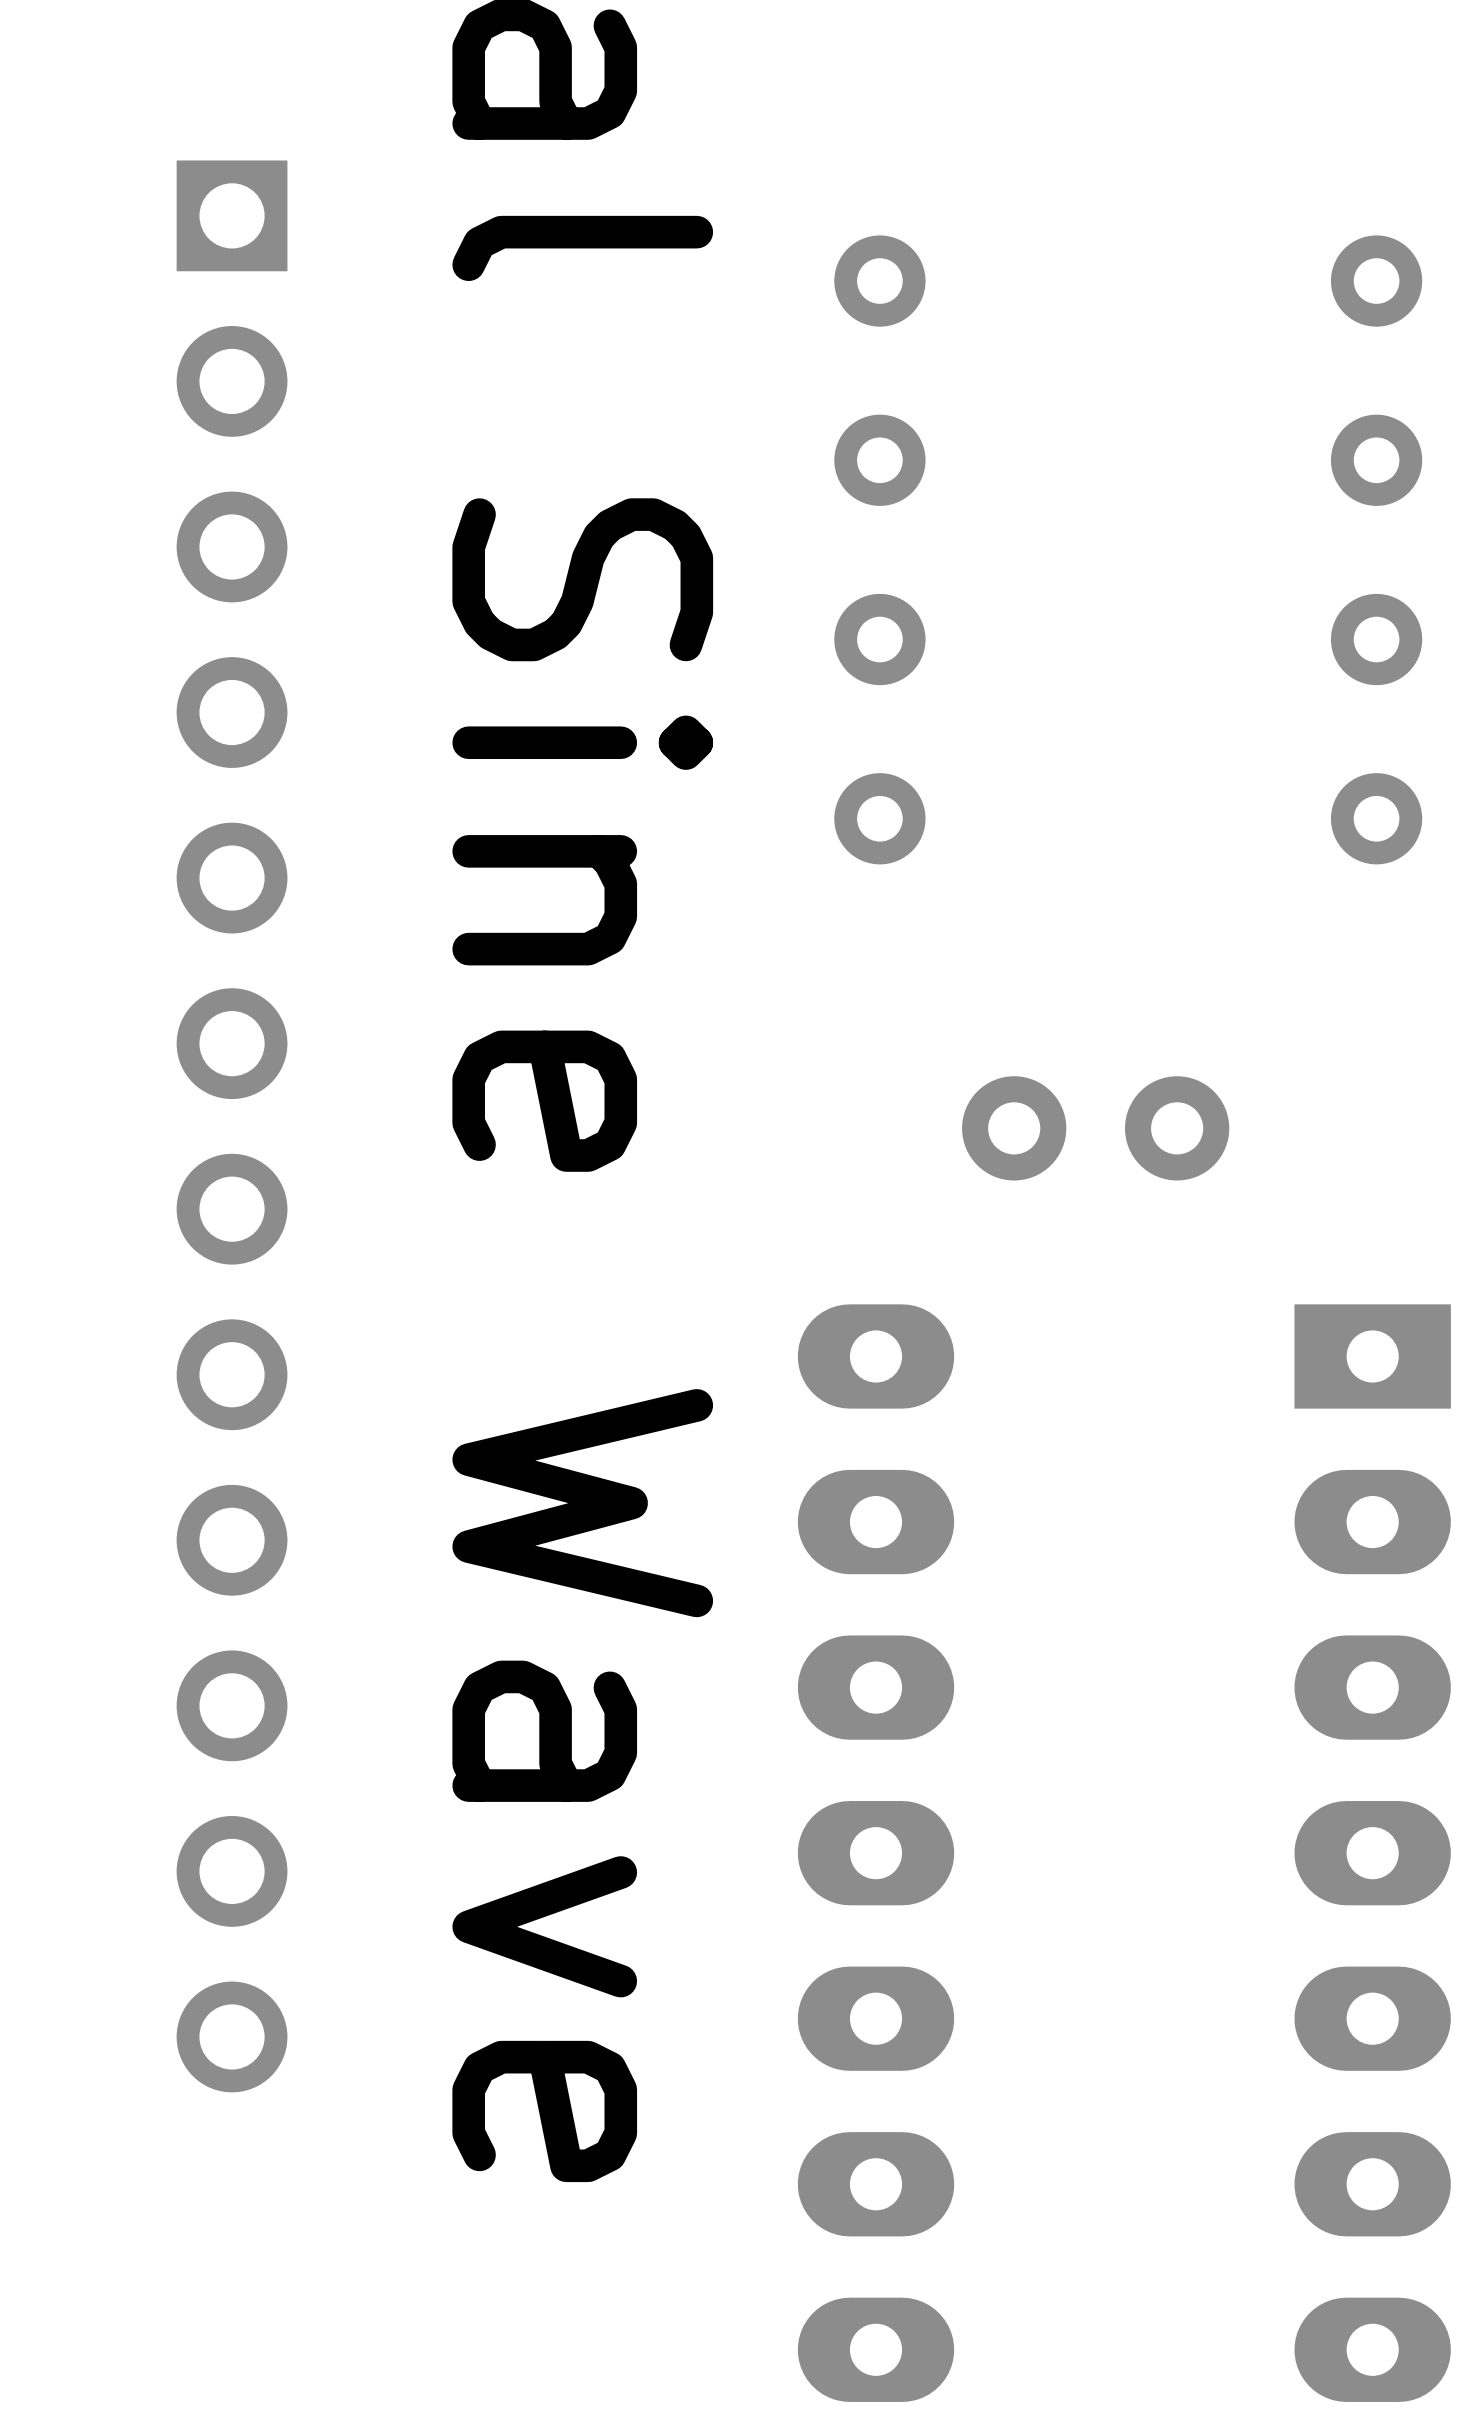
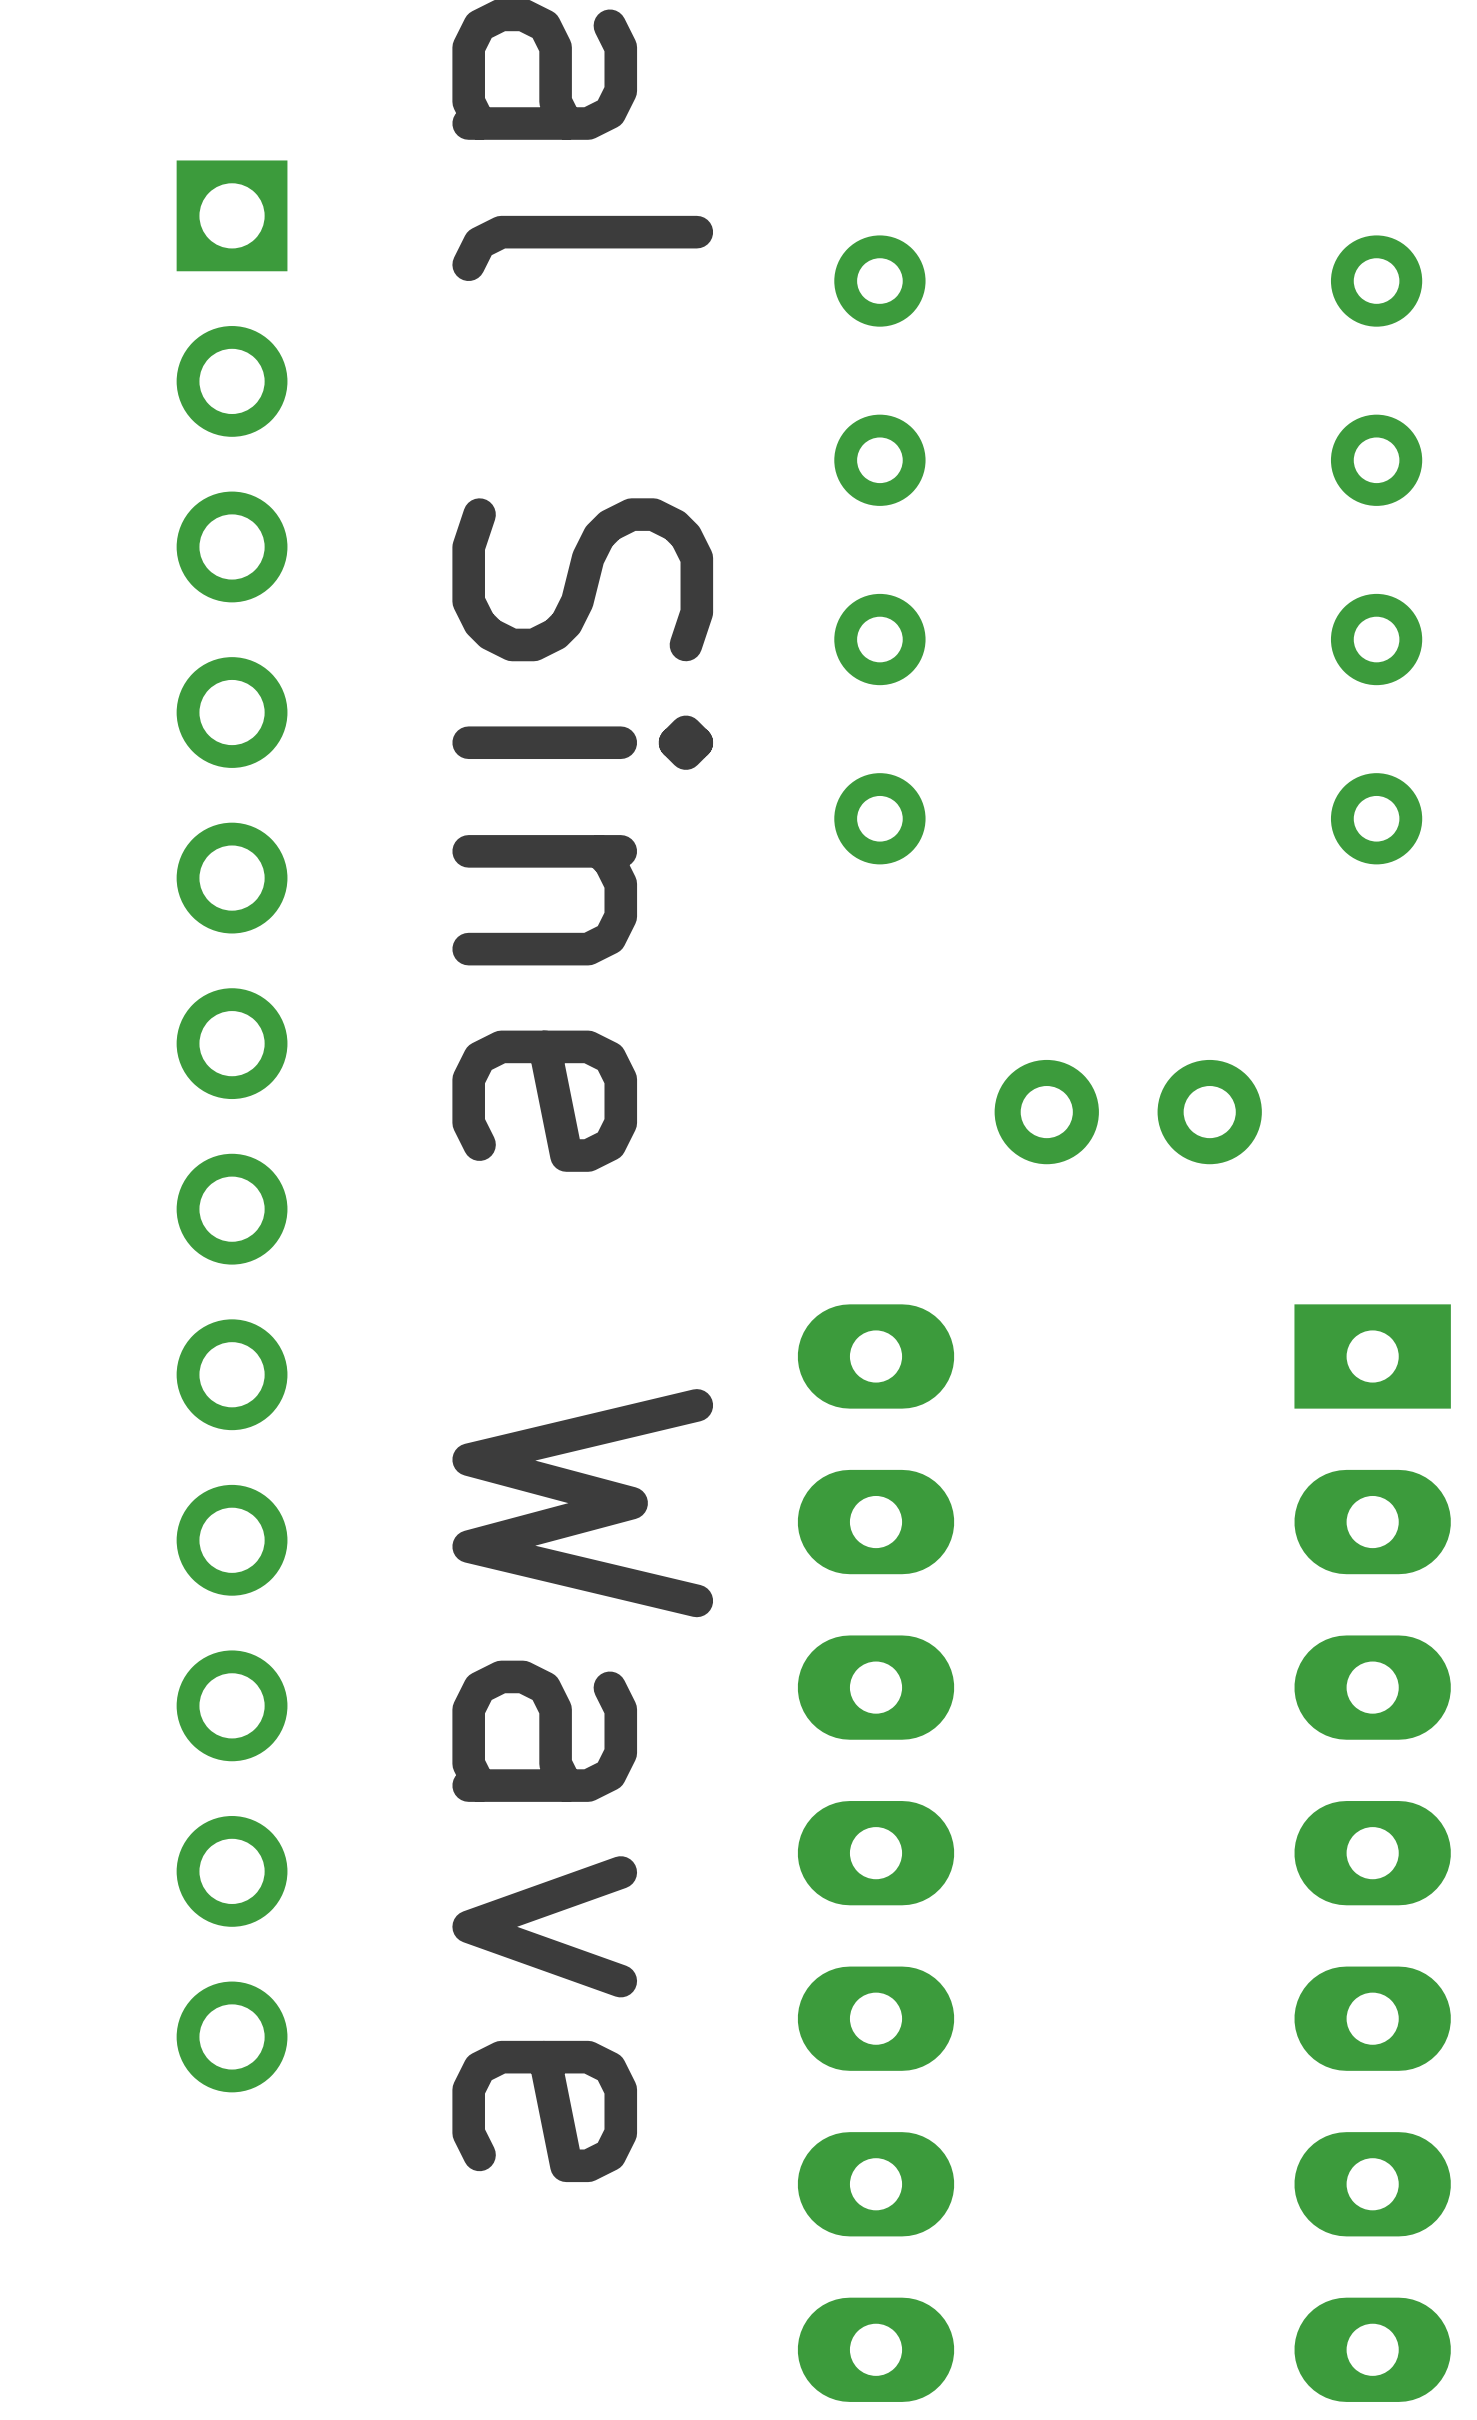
part position: (1095, 1128) -> (1128, 1112)

